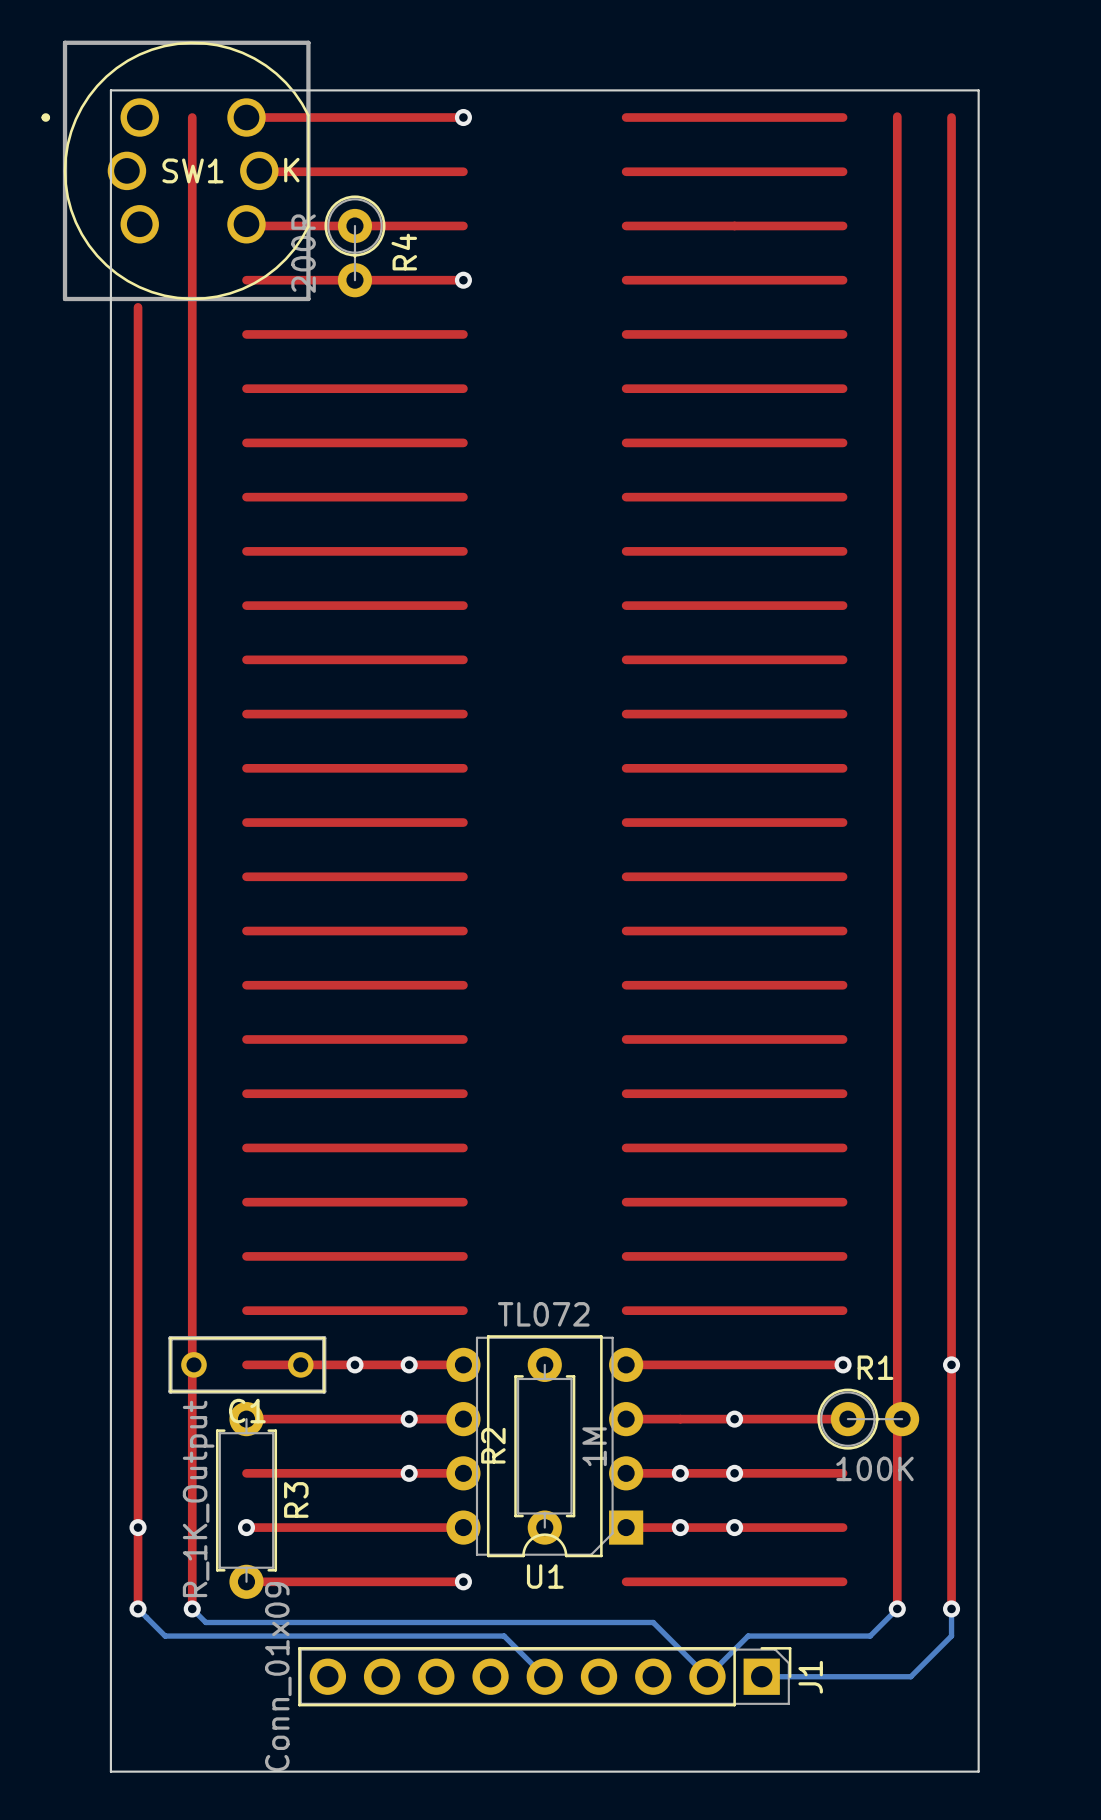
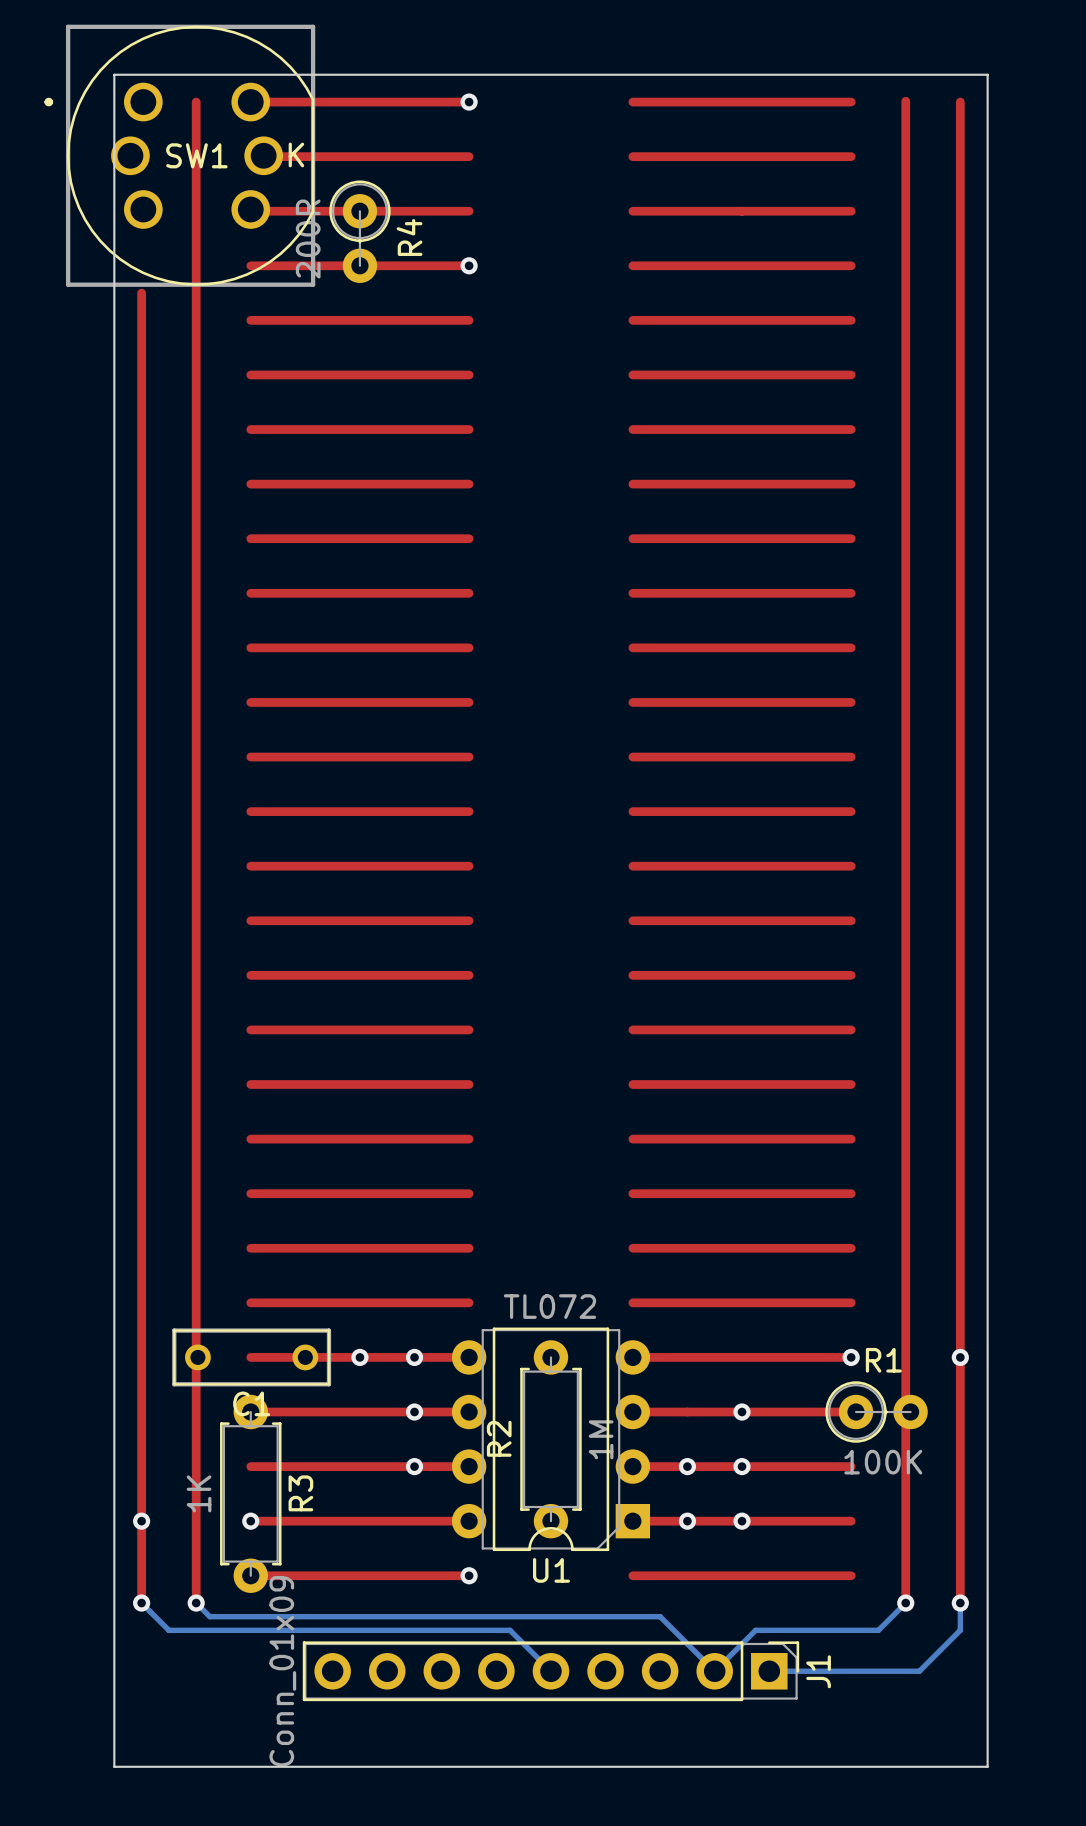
R3 value: R_1K_Output (198, 1498) -> 1K (199, 1493)

